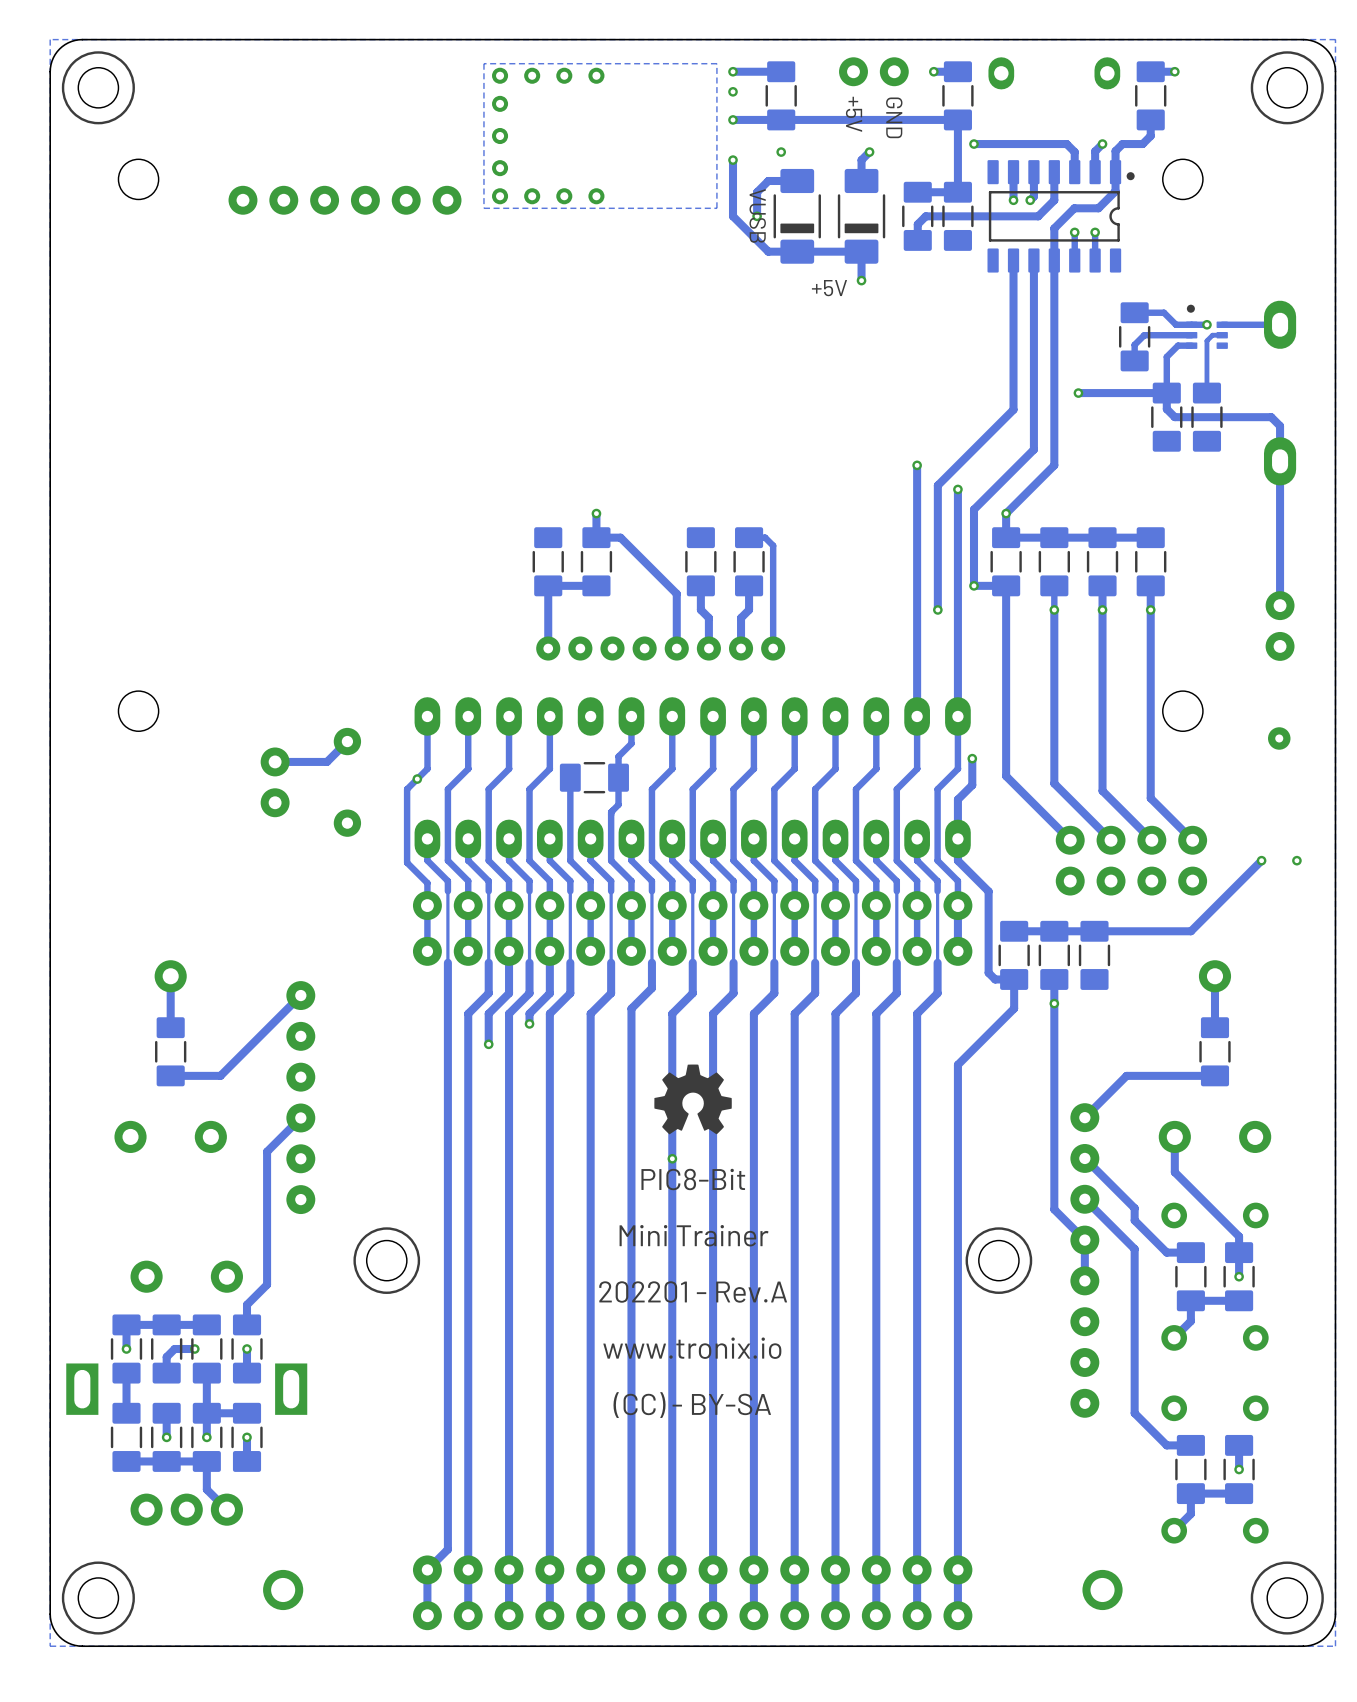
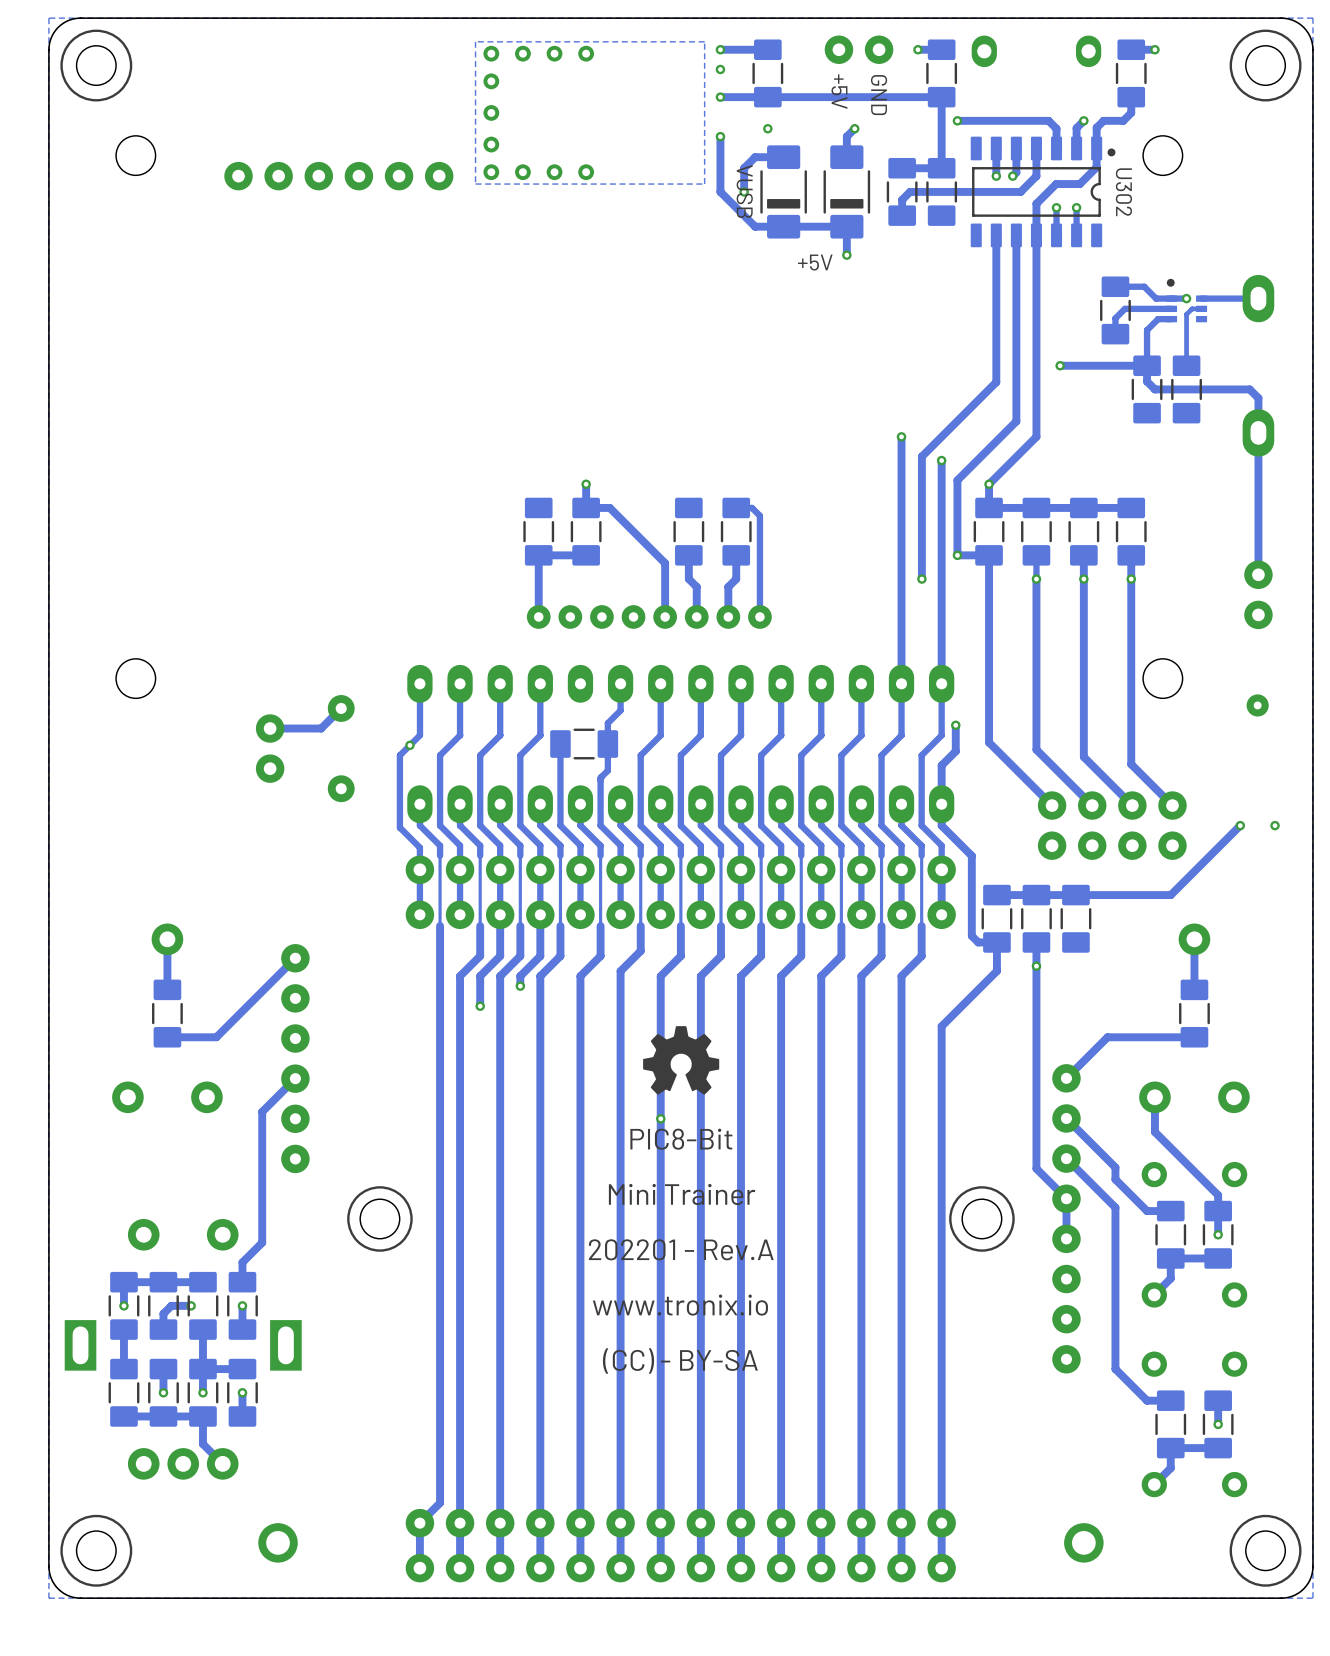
U302 name: none -> U302 (1123, 192)

